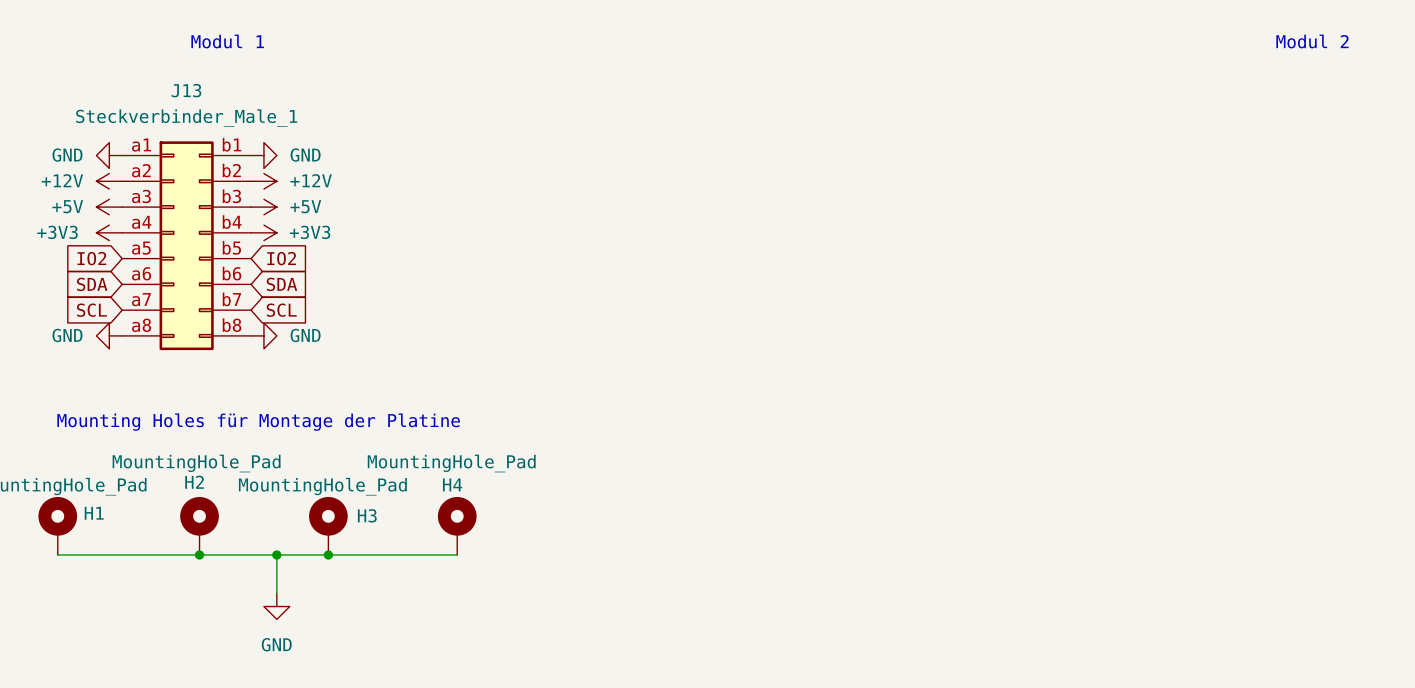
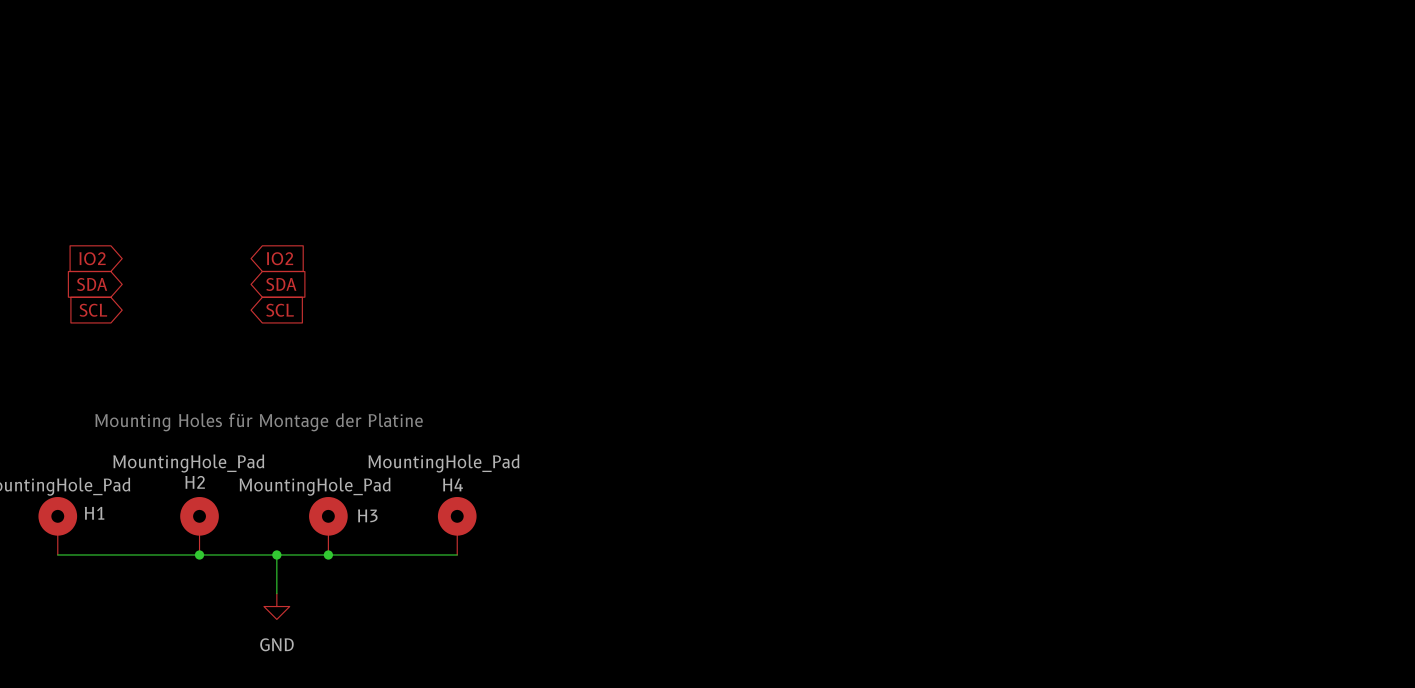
text: Modul 1 (227, 41) -> none
text: Modul 2 (1312, 41) -> none
power symbol: GND (109, 155) -> none
power symbol: GND (263, 155) -> none
power symbol: +12V (109, 181) -> none
power symbol: +12V (263, 181) -> none
power symbol: +5V (109, 207) -> none
power symbol: +5V (263, 207) -> none
power symbol: +3V3 (109, 232) -> none
power symbol: +3V3 (263, 232) -> none
J13: Steckverbinder_Male_1 (186, 245) -> none
power symbol: GND (109, 335) -> none
power symbol: GND (263, 335) -> none

